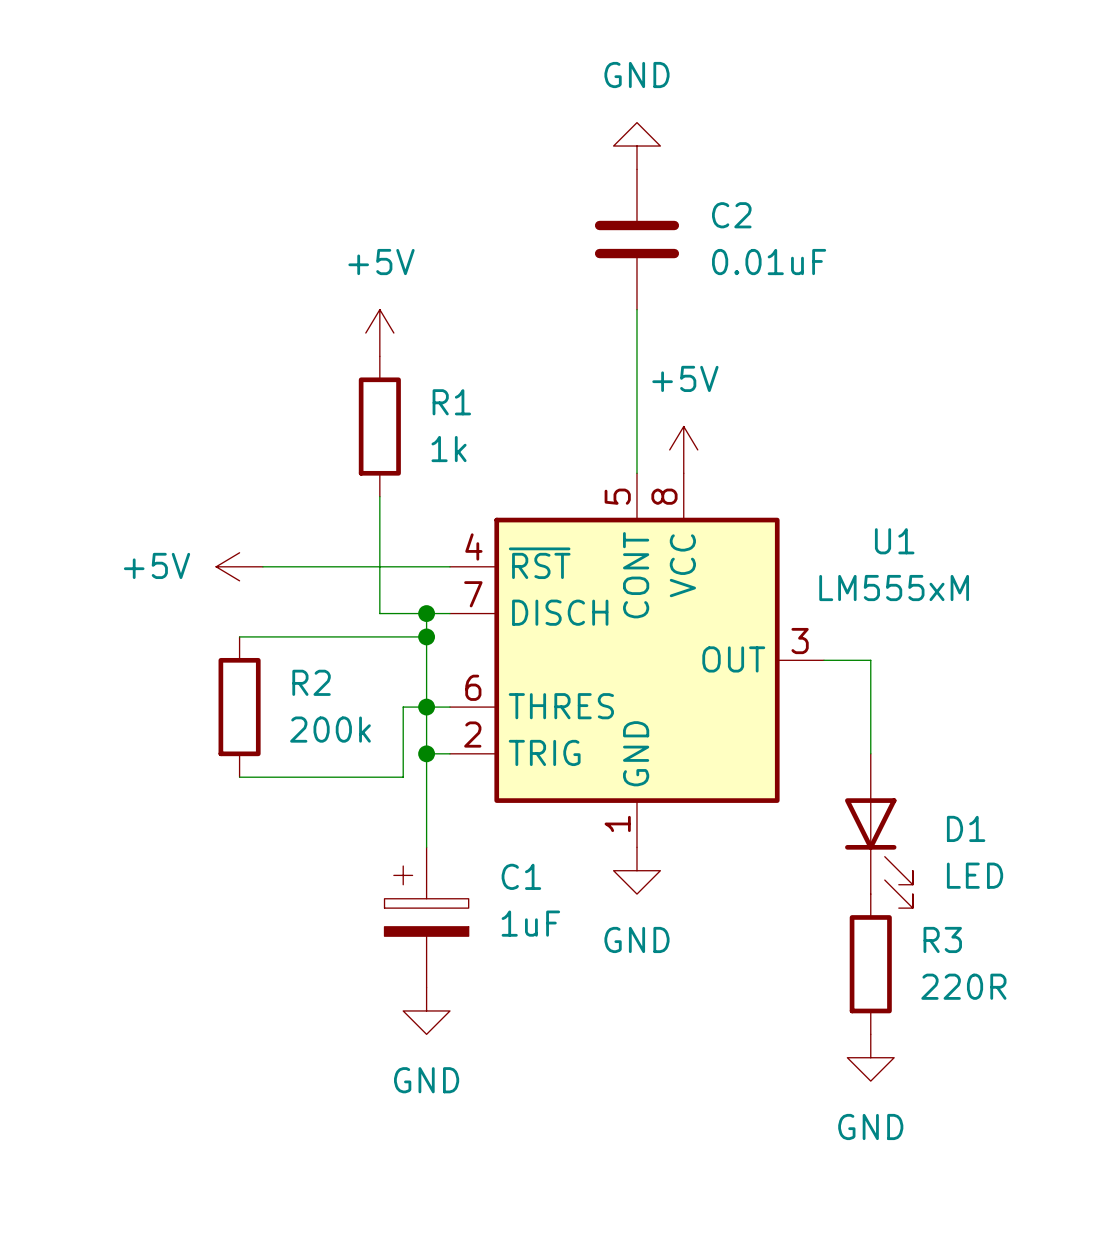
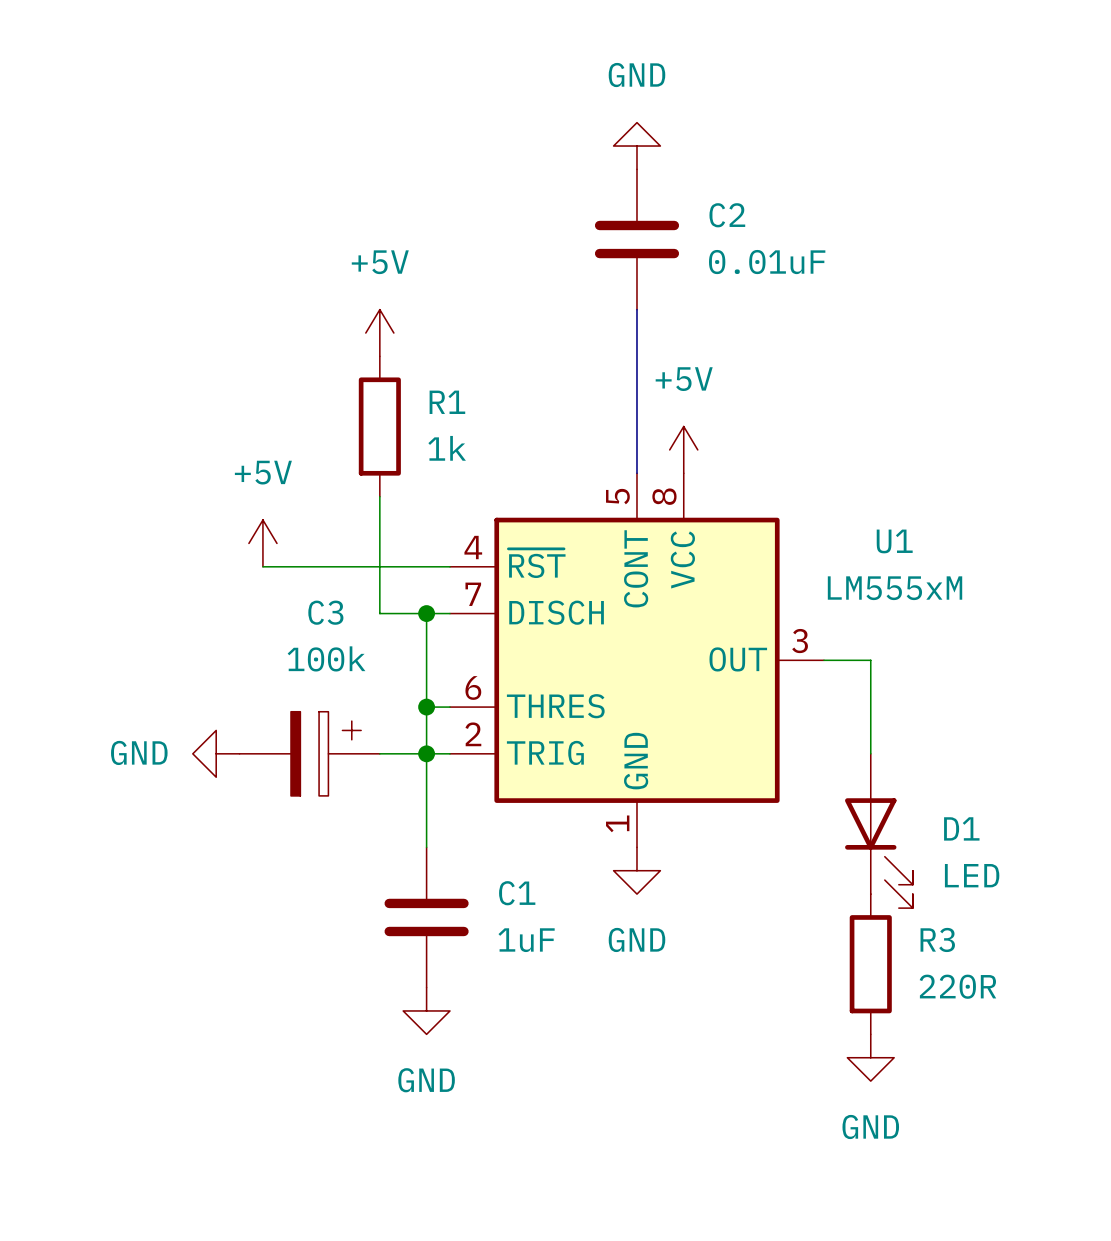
bus: none -> (636, 309) (636, 473)
power symbol rotation: 0° (239, 566) -> 90° clockwise (262, 543)
power symbol position: +5V (239, 566) -> +5V (262, 543)
wire: (239, 636) (426, 636) -> none
junction: (426, 636) -> none
R2: 200k (239, 707) -> none
wire: (426, 707) (403, 707) (403, 777) (239, 777) -> none
power symbol: none -> GND (216, 753)
C3: none -> 100k (309, 753)
wire: none -> (379, 753) (426, 753)
C1 symbol: [384, 847, 469, 988] -> [384, 847, 469, 988]

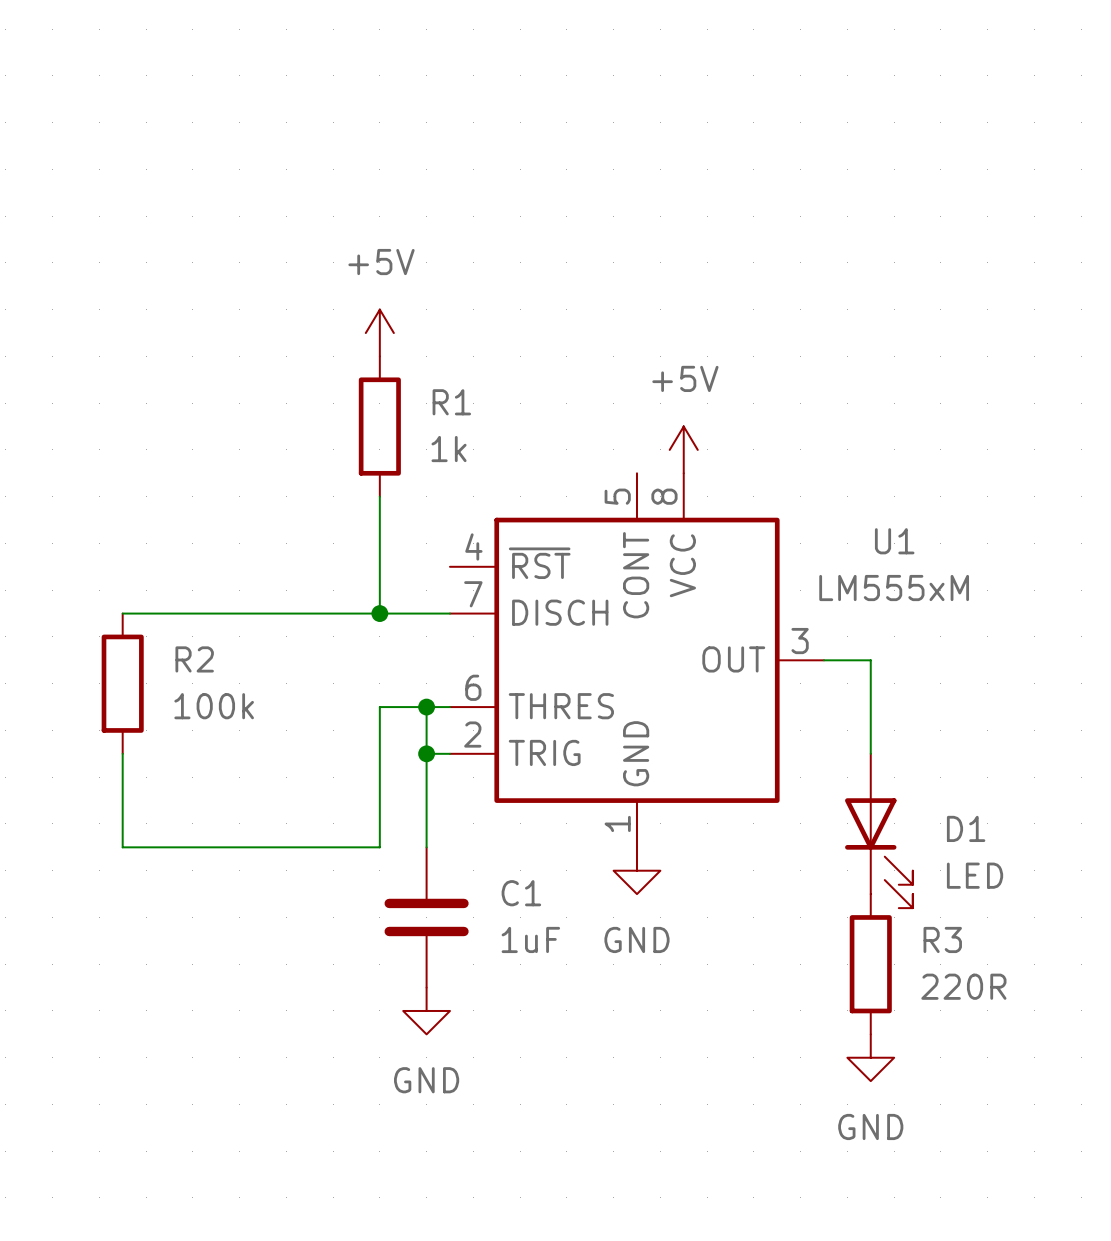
power symbol: GND (636, 146) -> none
C2: 0.01uF (636, 239) -> none
bus: (636, 309) (636, 473) -> none
power symbol: +5V (262, 543) -> none
wire: (262, 566) (449, 566) -> none
wire: none -> (122, 613) (379, 613)
wire: (426, 613) (426, 707) -> (122, 753) (122, 847) (379, 847) (379, 707) (426, 707)
junction position: (426, 613) -> (379, 613)
R2: none -> 100k (122, 683)
power symbol: GND (216, 753) -> none
C3: 100k (309, 753) -> none
wire: (379, 753) (426, 753) -> none

